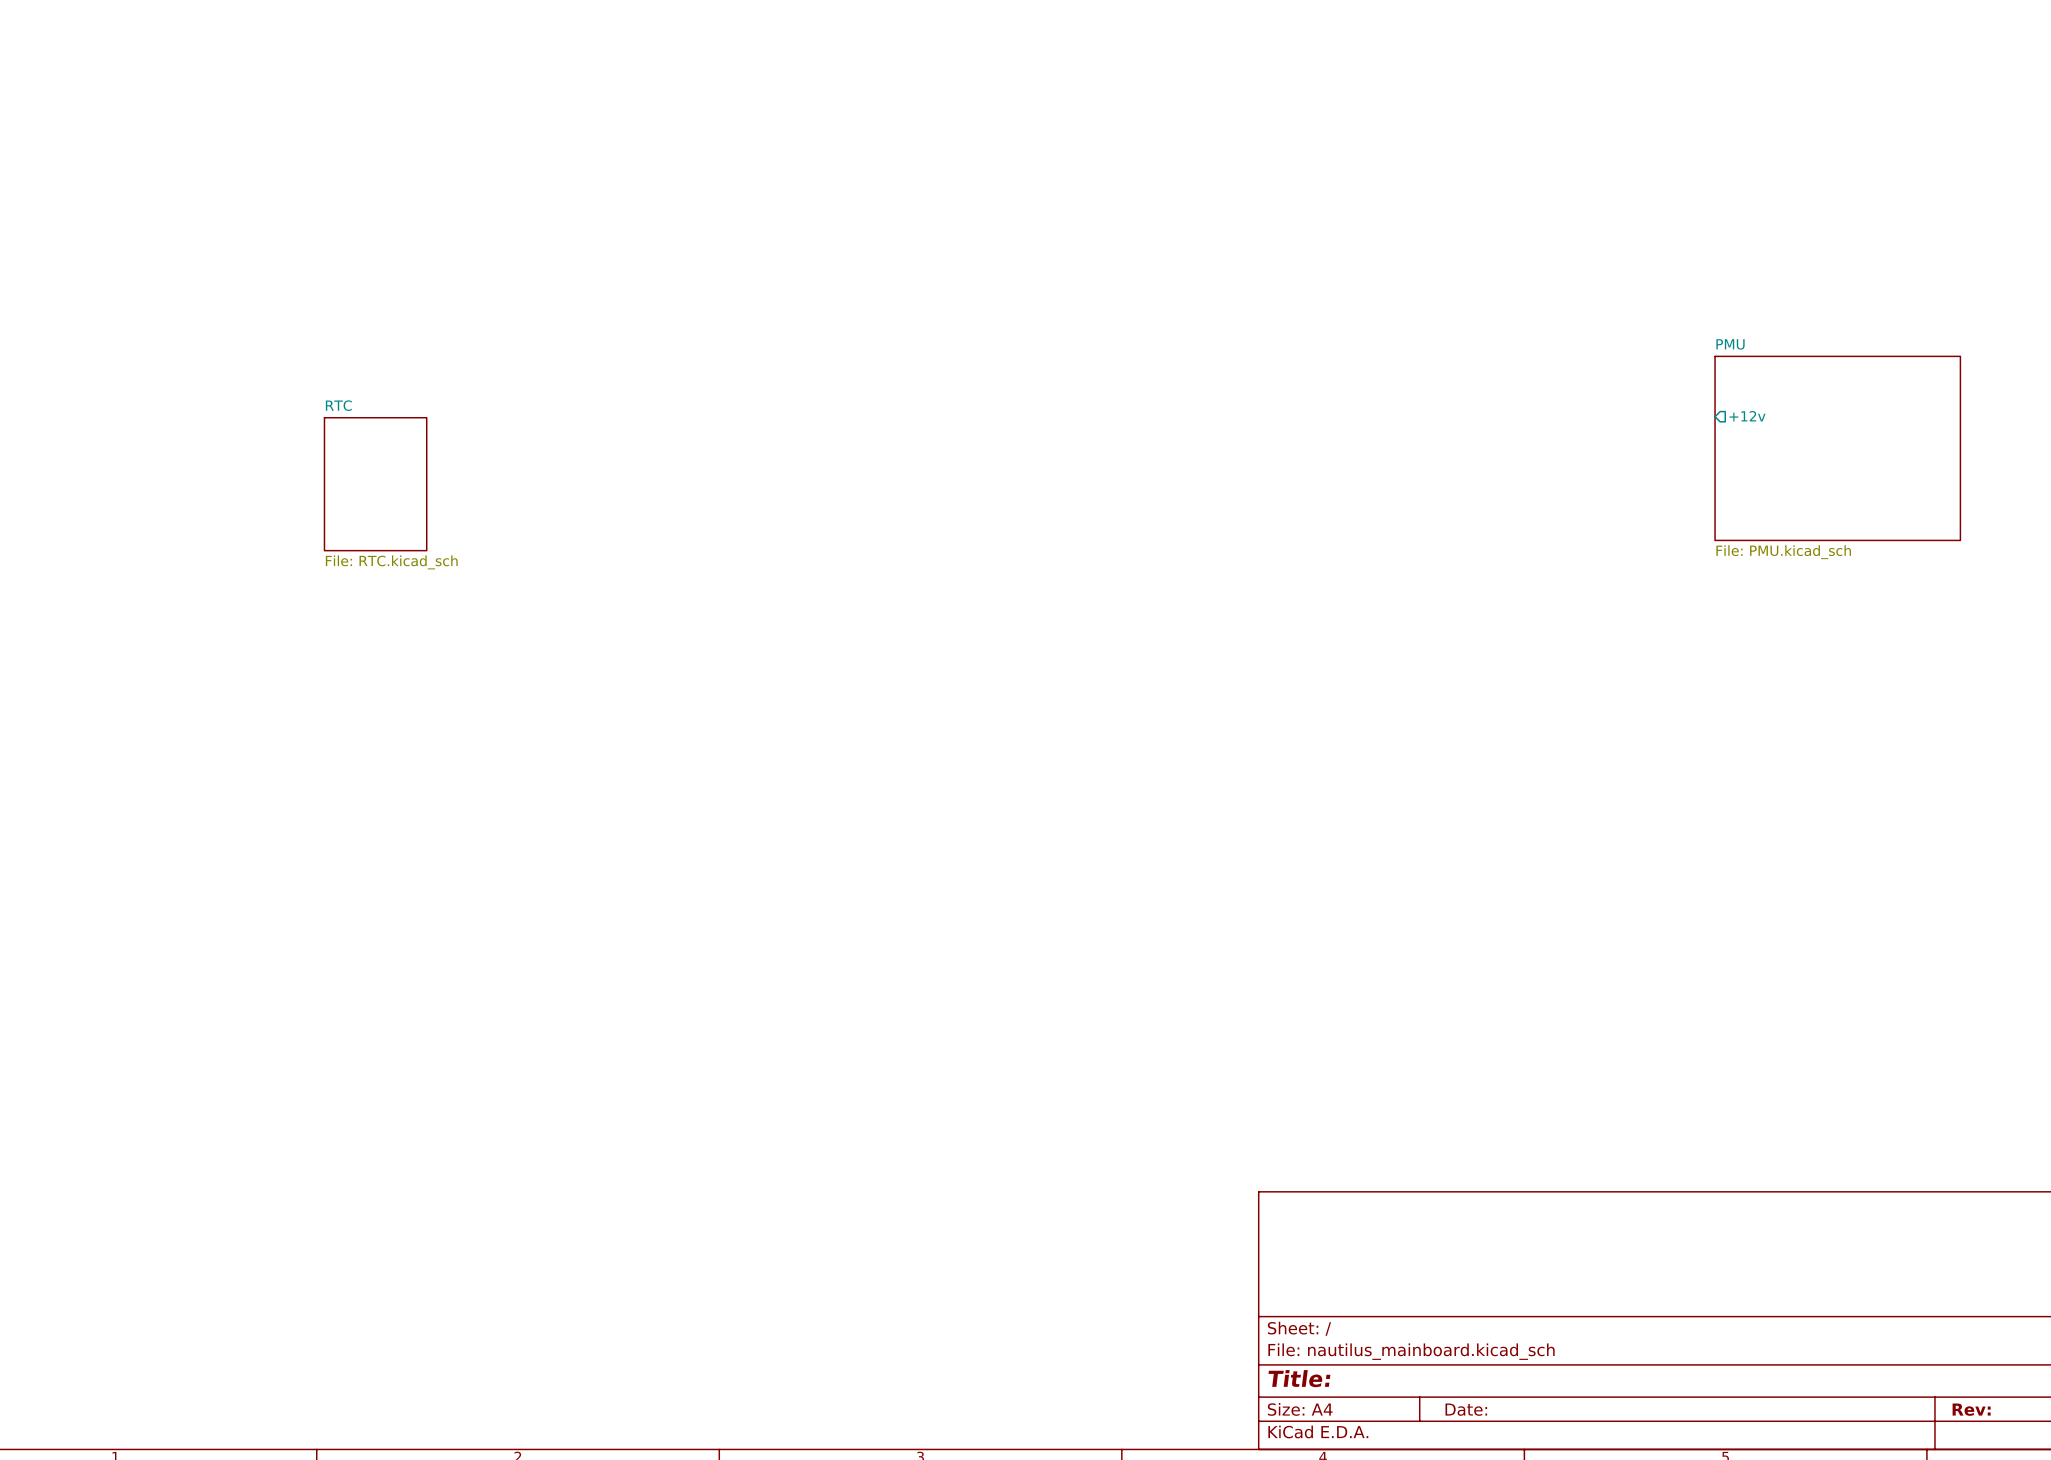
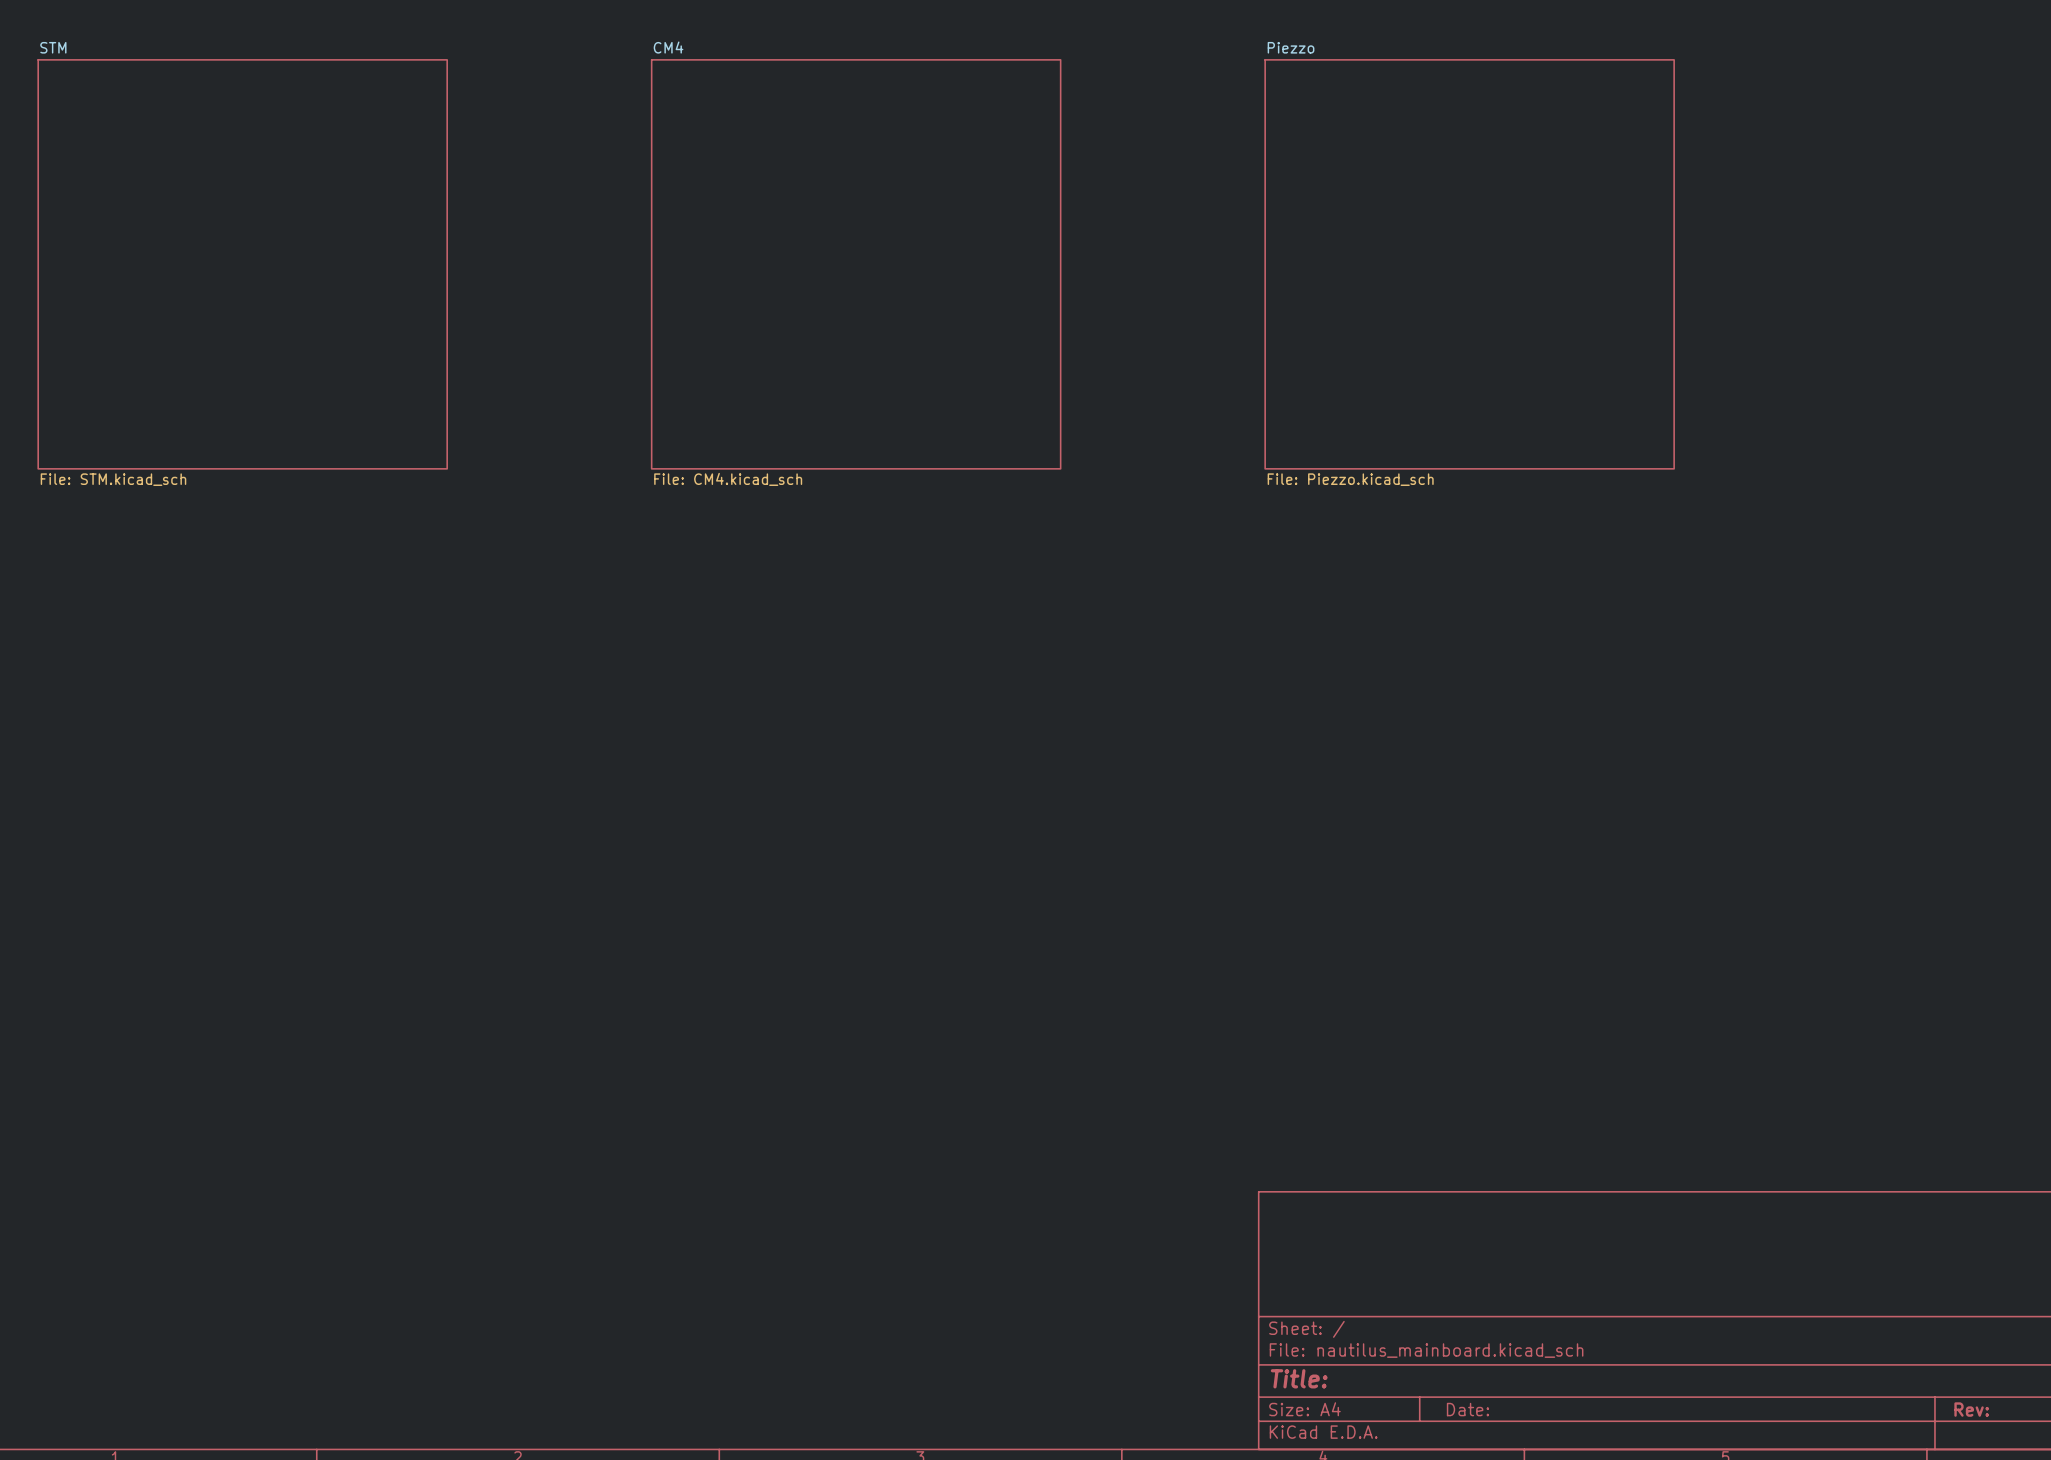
sheet STM: none -> File: STM.kicad_sch (242, 264)
sheet CM4: none -> File: CM4.kicad_sch (856, 264)
sheet Piezzo: none -> File: Piezzo.kicad_sch (1469, 264)
sheet pin: +12v (1747, 416) -> none
sheet PMU: File: PMU.kicad_sch (1837, 448) -> none
sheet RTC: File: RTC.kicad_sch (375, 484) -> none

